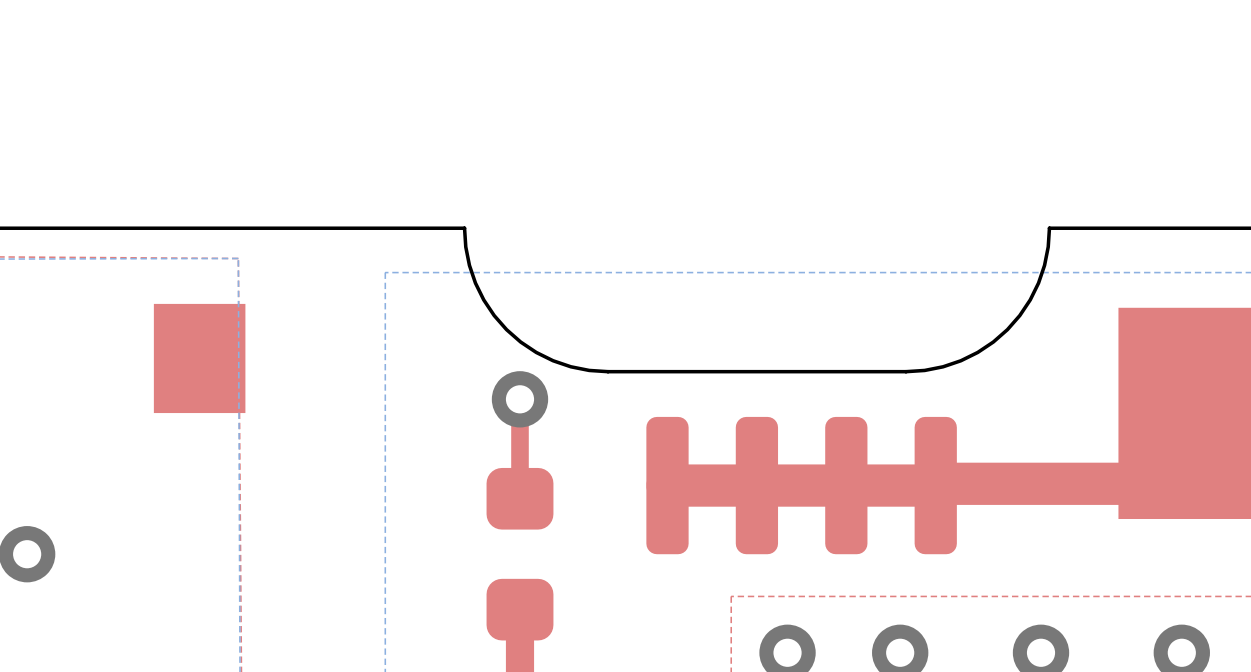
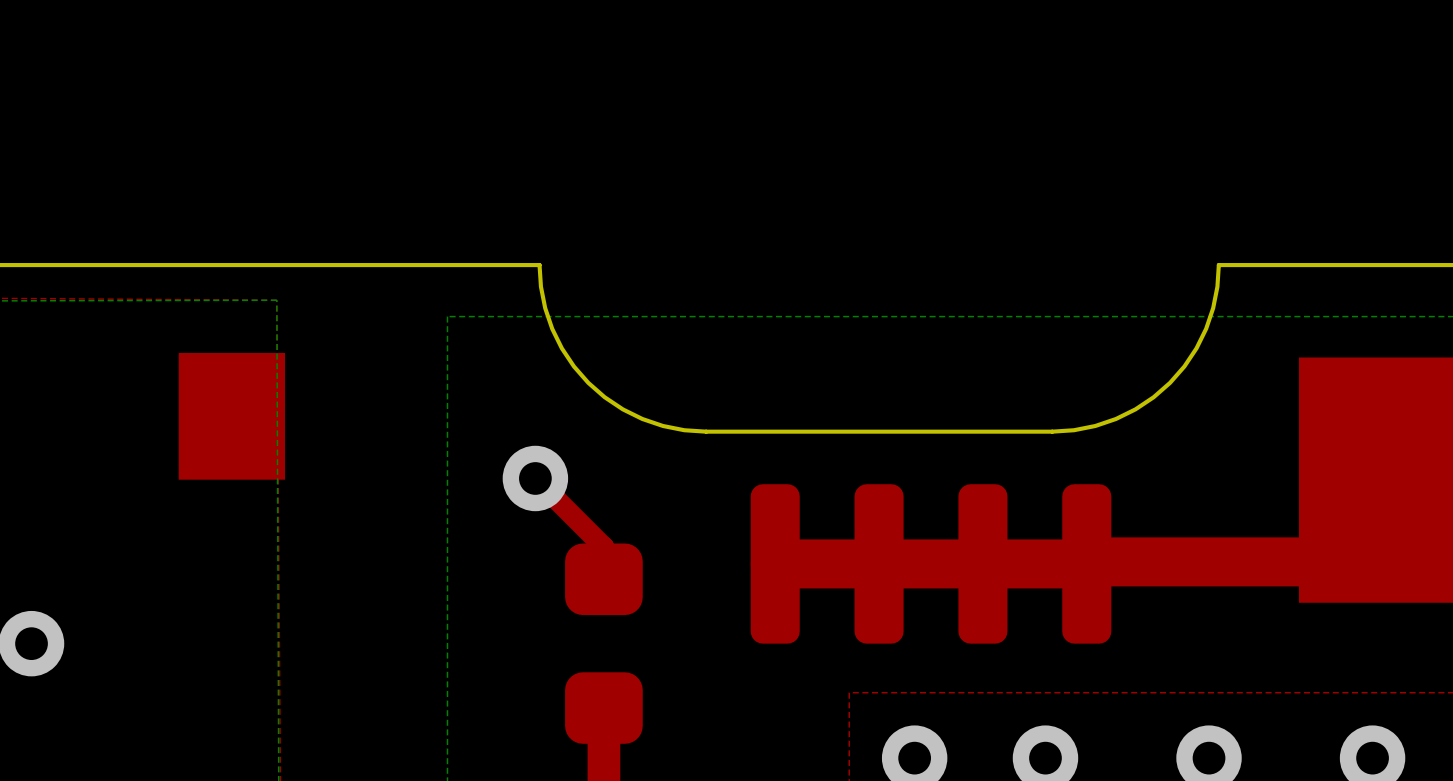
top track: (519, 399) (519, 470) -> (535, 478) (603, 547)
via position: (519, 399) -> (535, 478)

